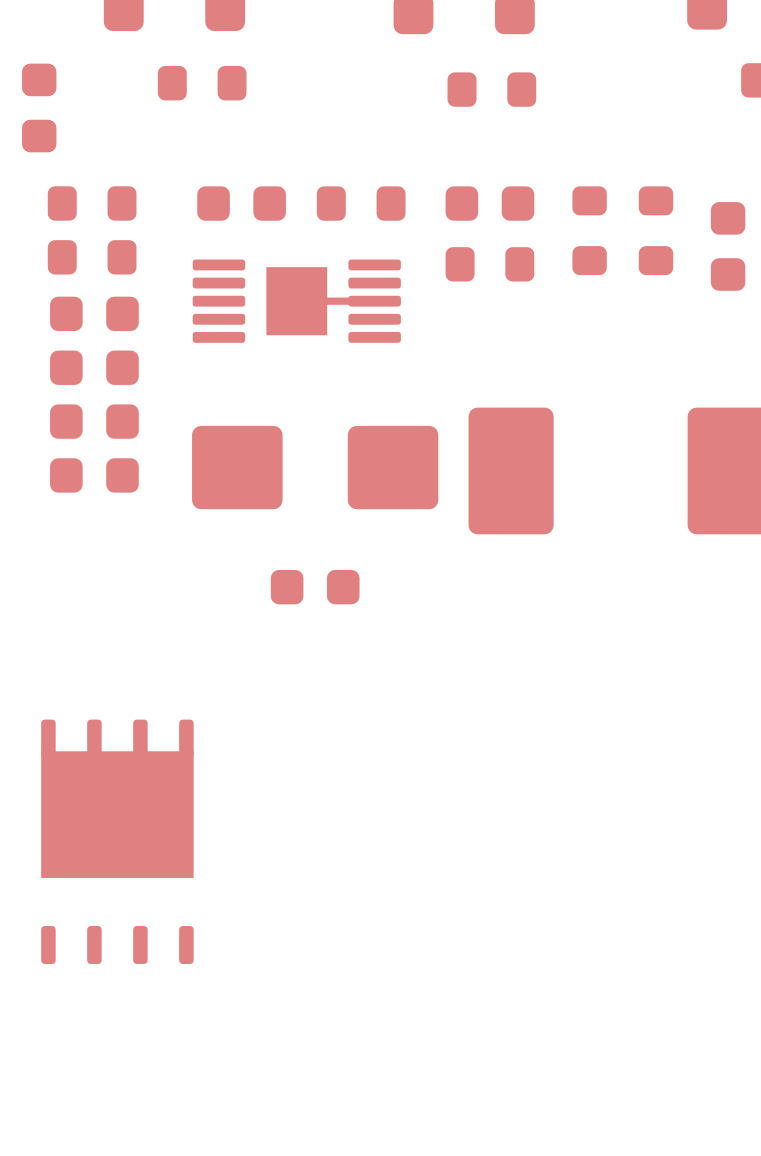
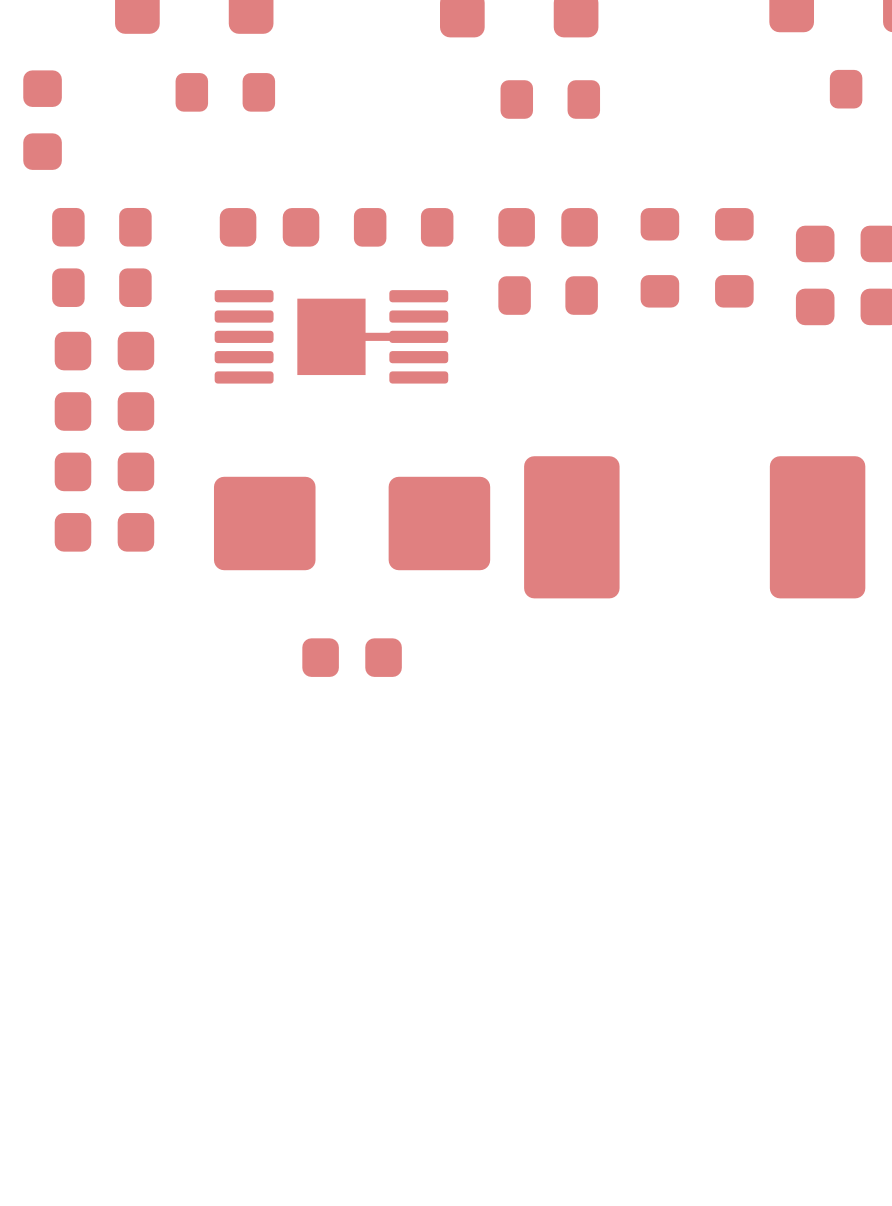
part: (117, 841) -> none

